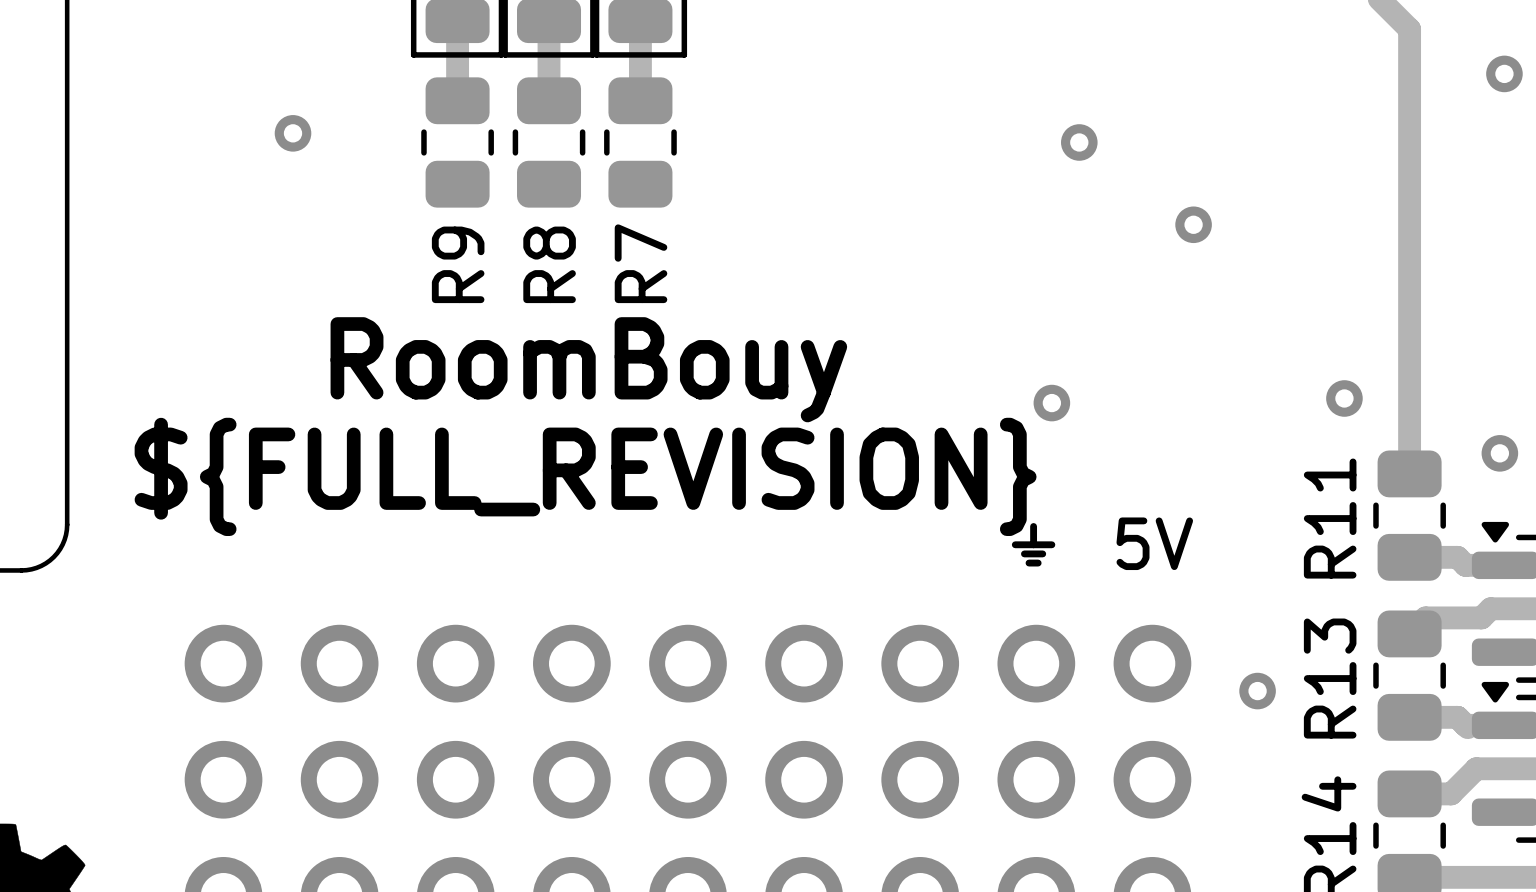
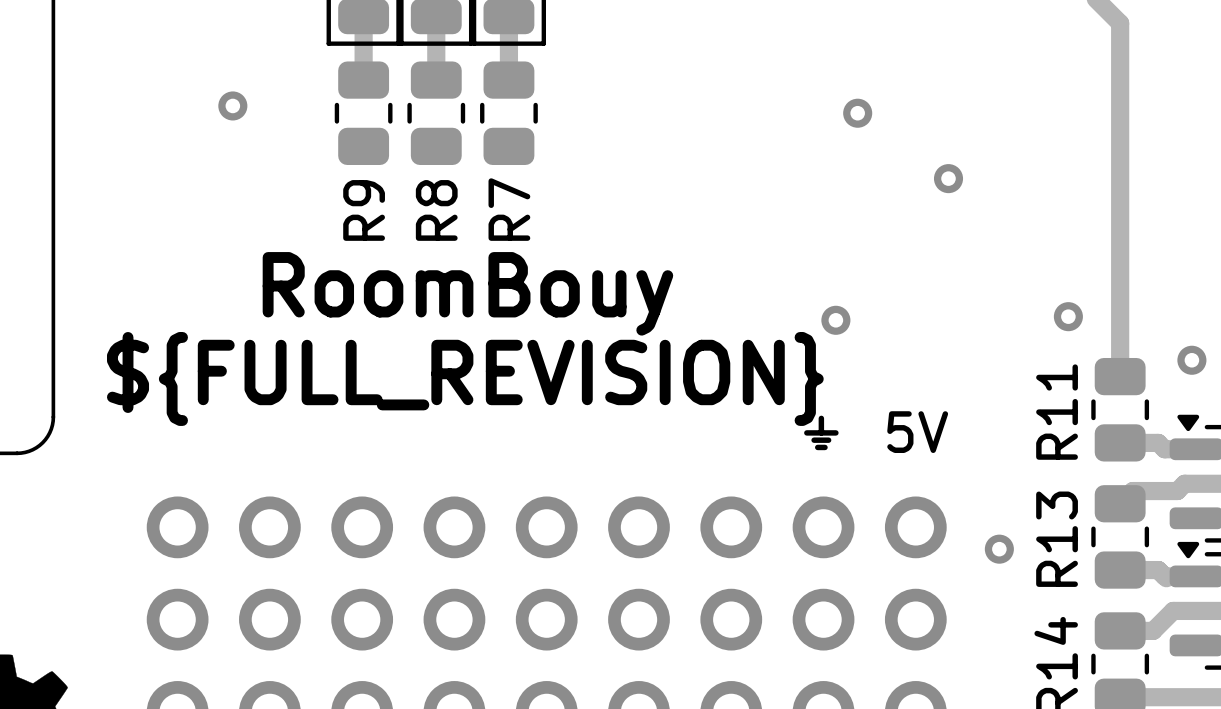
via: (1504, 73) -> none

